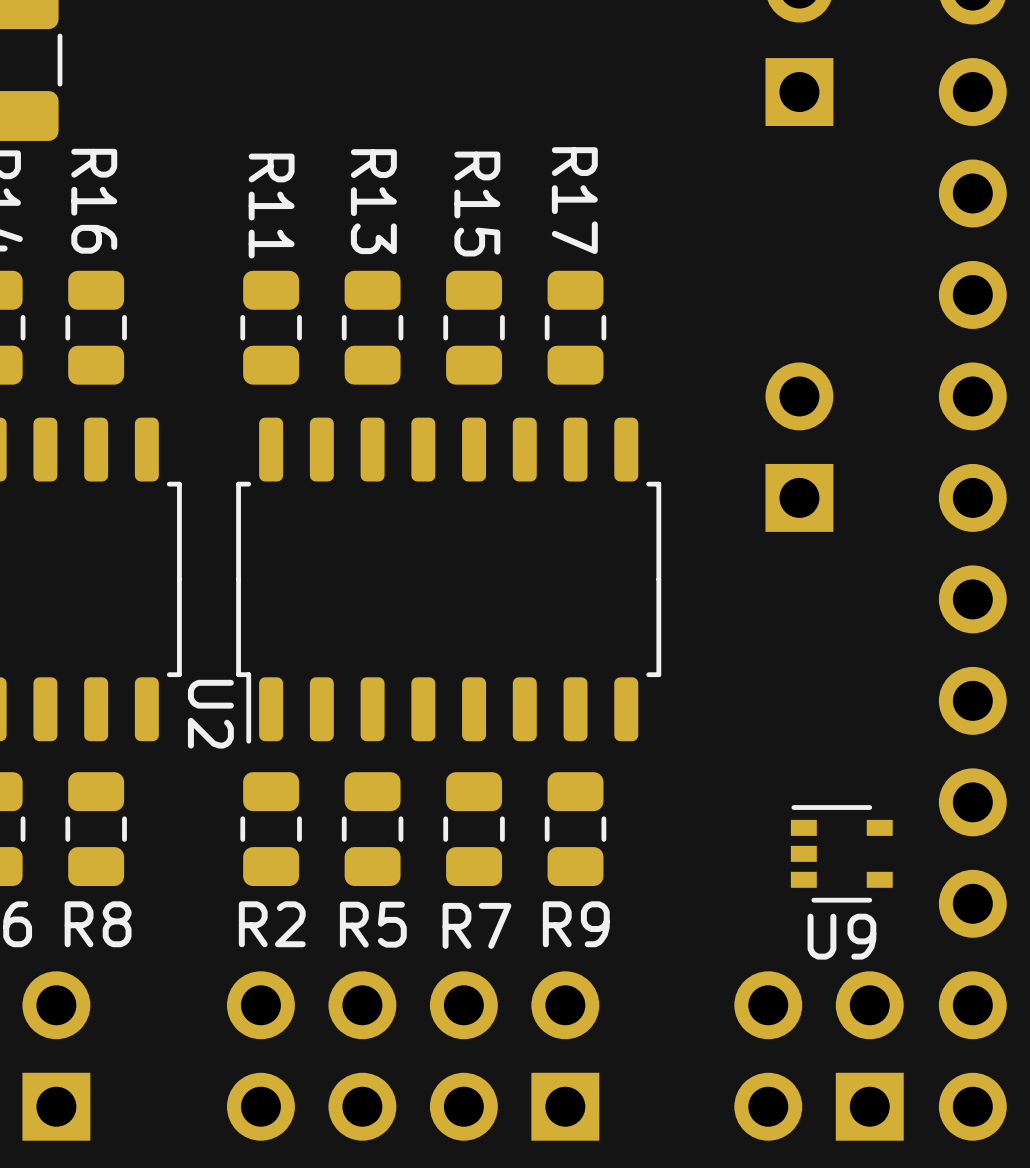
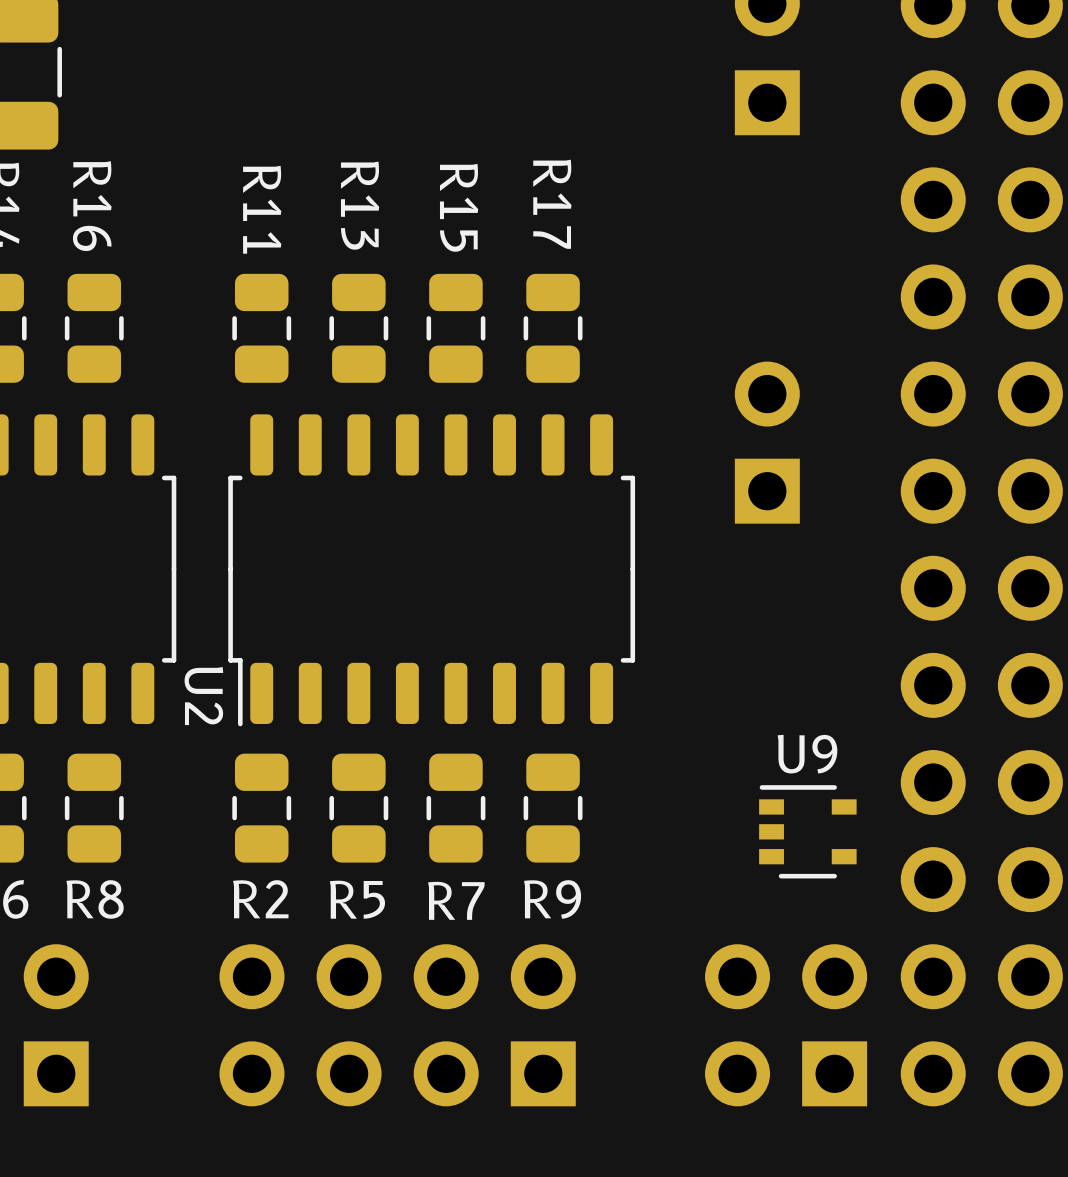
U9 name position: U9 (841, 936) -> U9 (807, 754)

